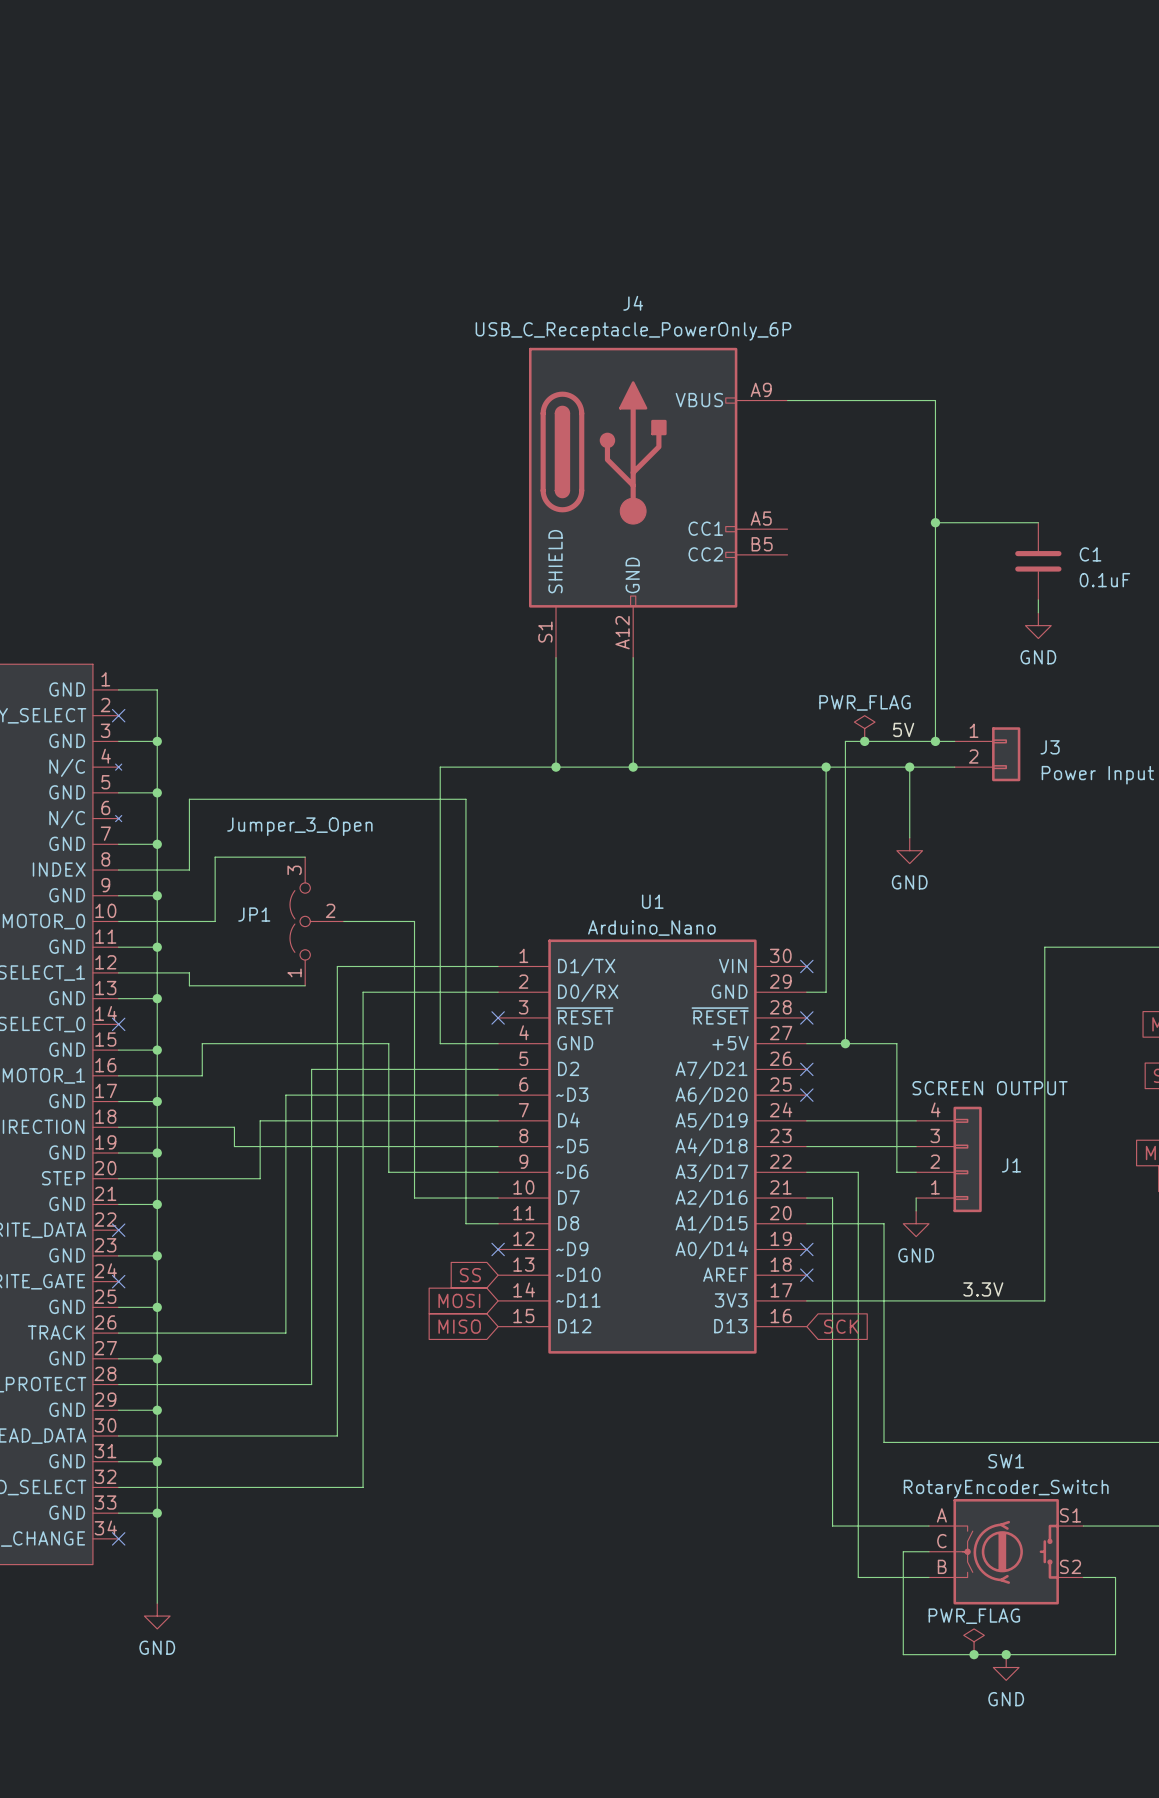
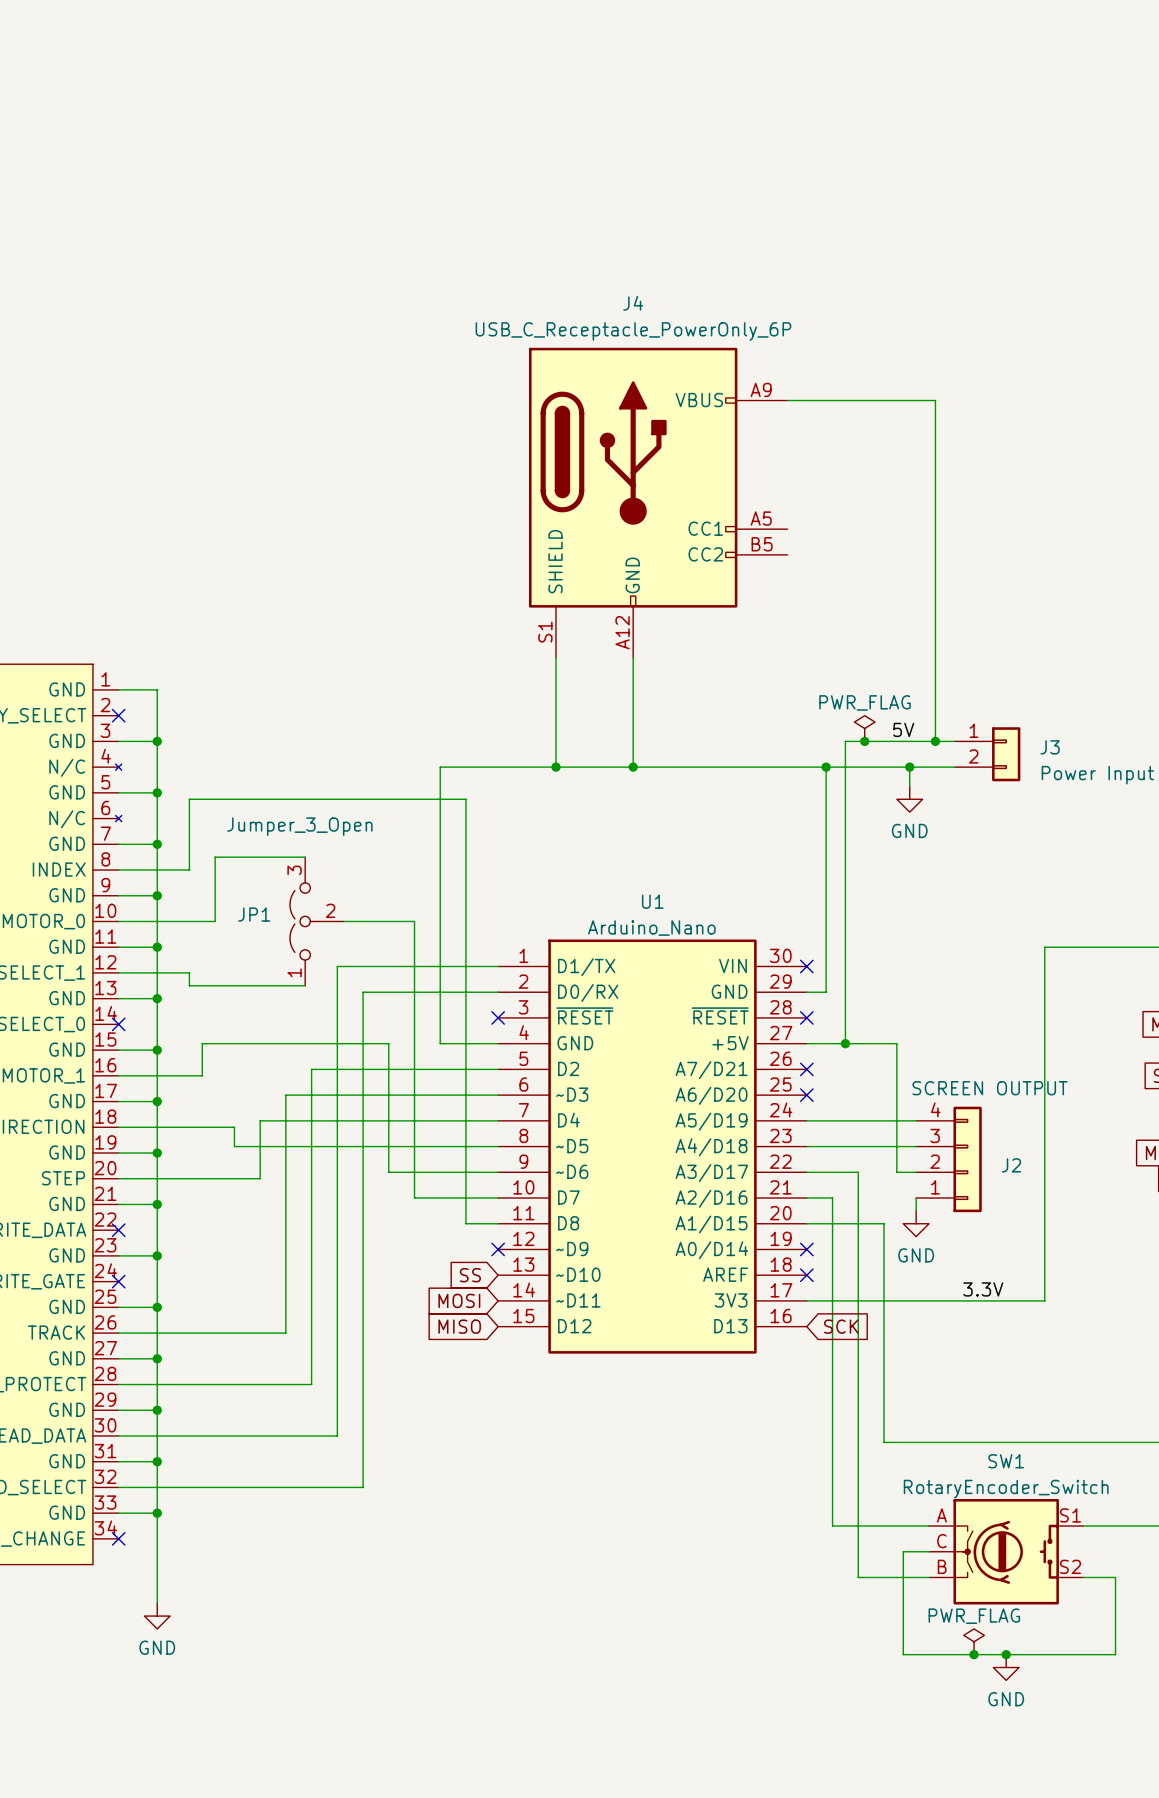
wire: (935, 522) (1038, 522) -> none
junction: (935, 522) -> none
C1: 0.1uF (1038, 561) -> none
wire: (1038, 599) (1038, 612) -> none
power symbol: GND (1038, 625) -> none
wire: (909, 786) (909, 837) -> none
power symbol position: GND (909, 850) -> GND (909, 799)
J1 name: J1 (1011, 1165) -> J2 (1011, 1165)

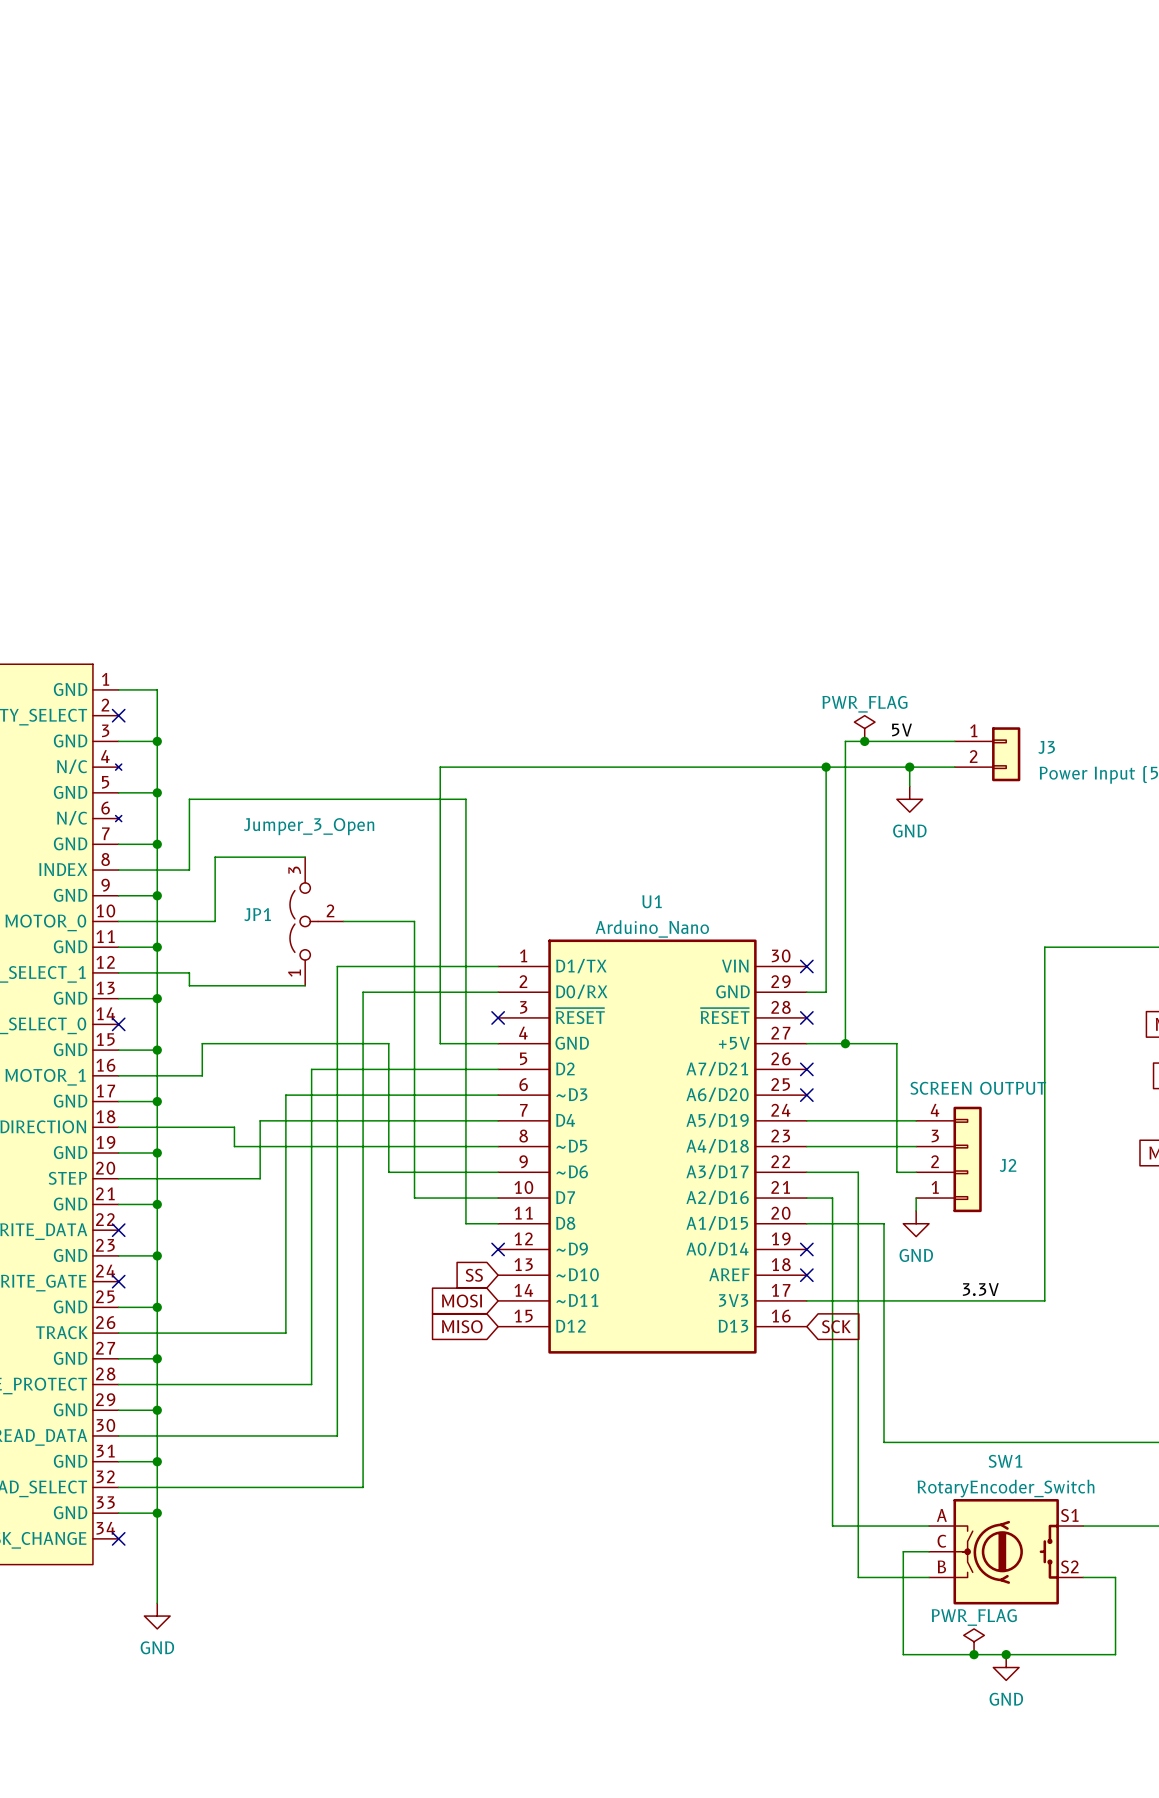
wire: (787, 400) (935, 400) (935, 741) -> none
J4: USB_C_Receptacle_PowerOnly_6P (658, 502) -> none
wire: (556, 657) (556, 767) -> none
wire: (633, 657) (633, 767) -> none
junction: (935, 741) -> none
junction: (556, 767) -> none
junction: (633, 767) -> none

